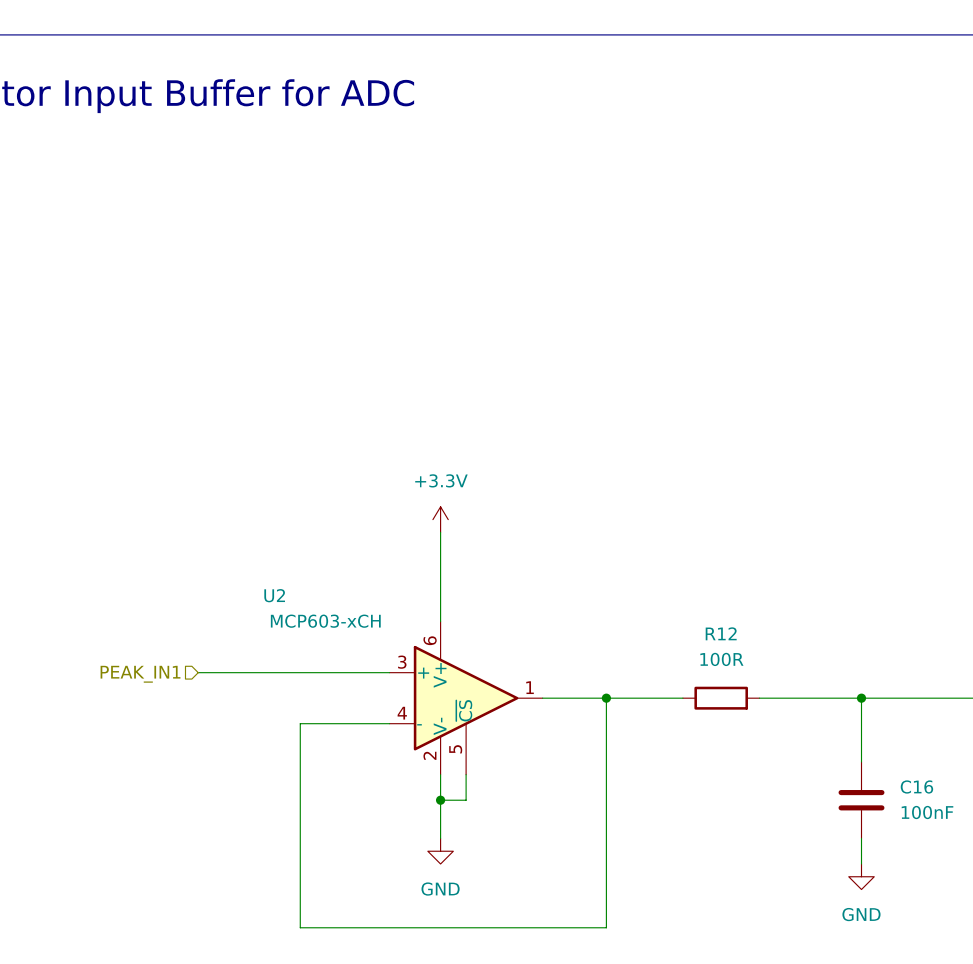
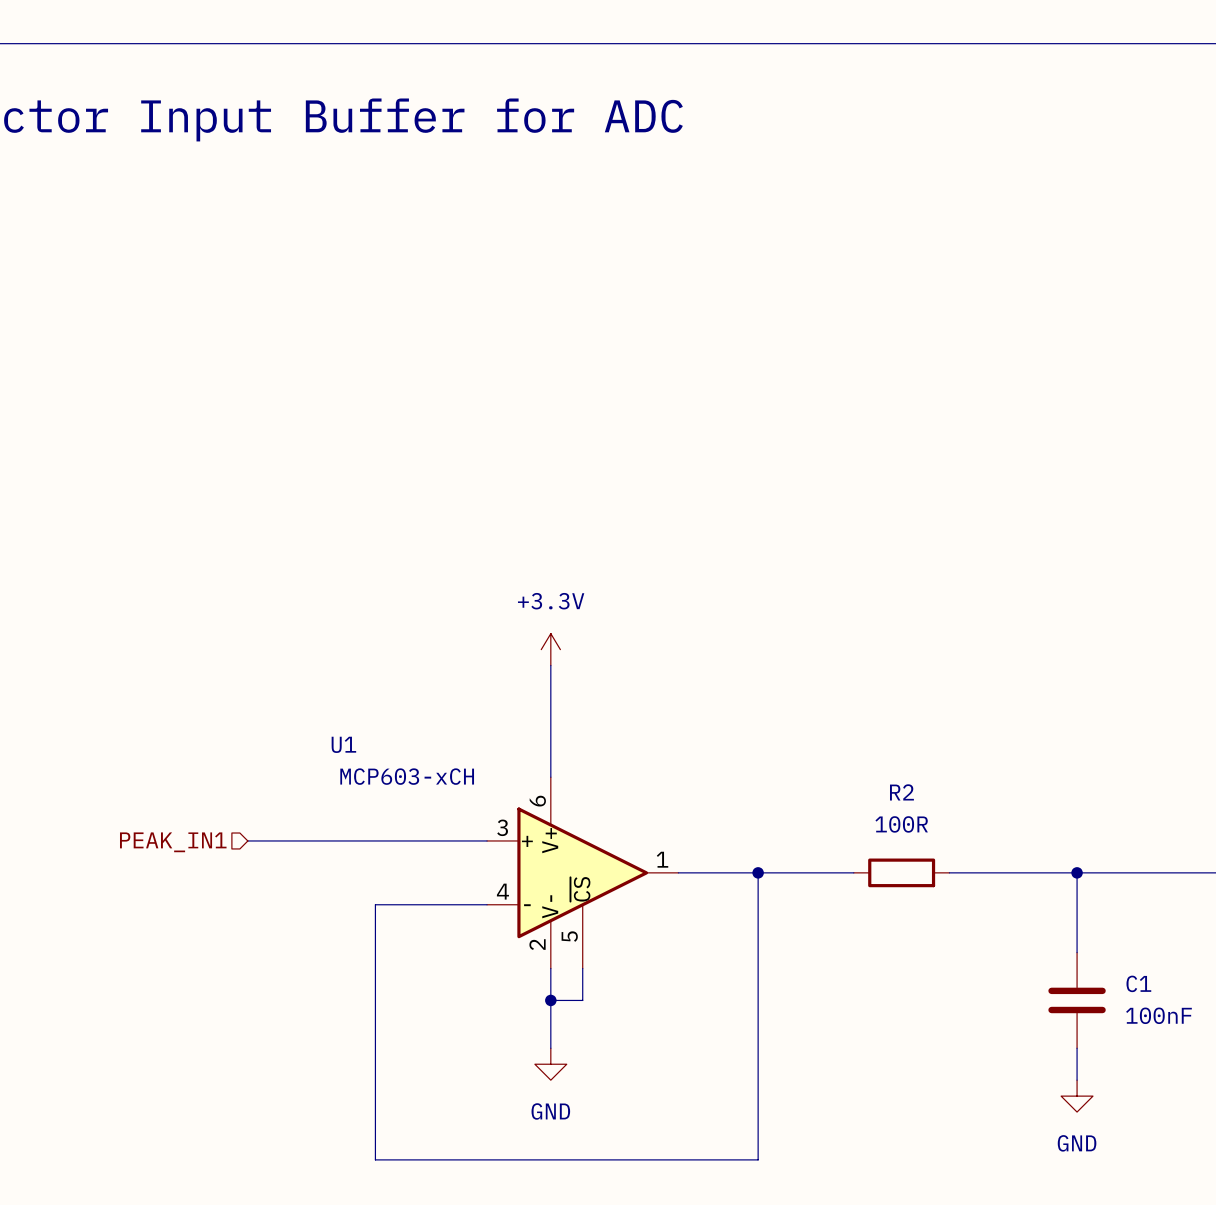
U2 name: U2 (274, 595) -> U1 (343, 744)
R12 name: R12 (721, 633) -> R2 (901, 792)
C16 name: C16 (916, 787) -> C1 (1138, 983)

